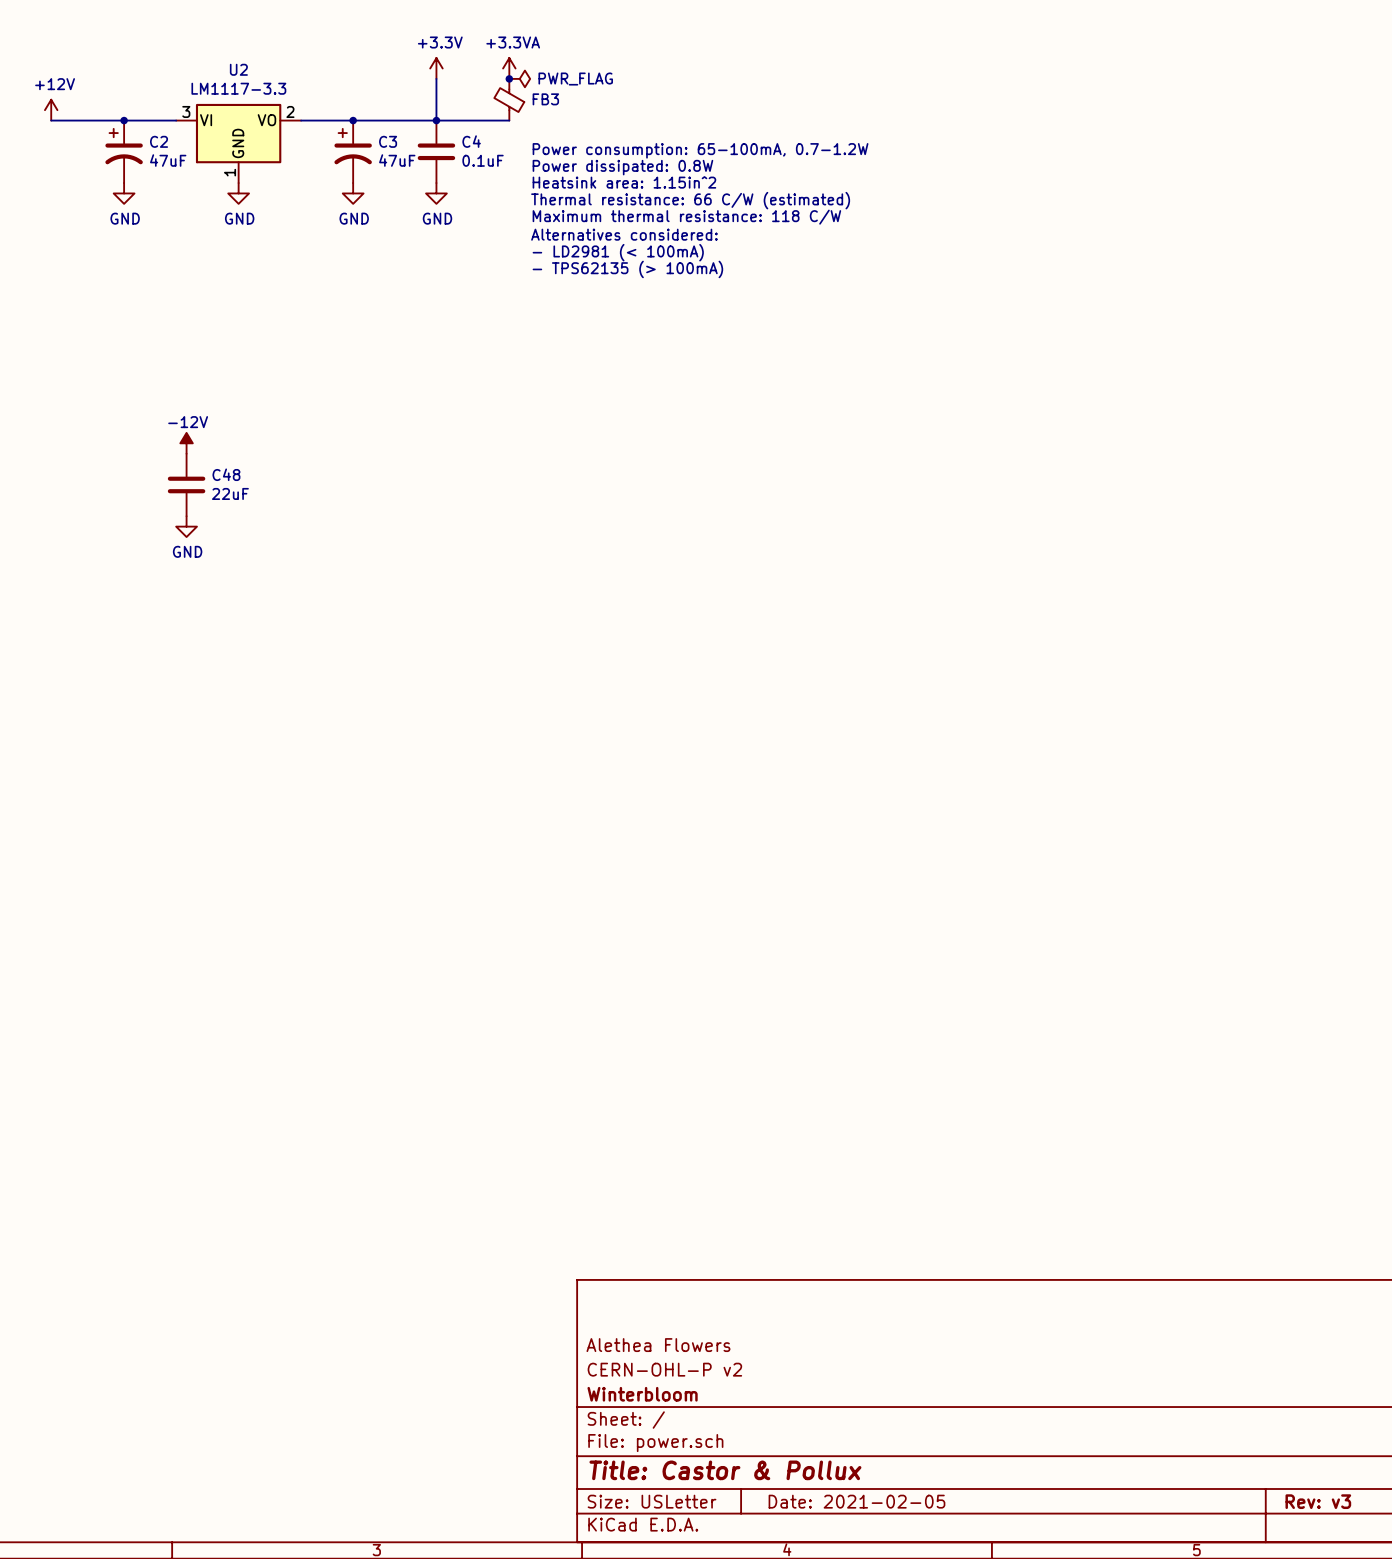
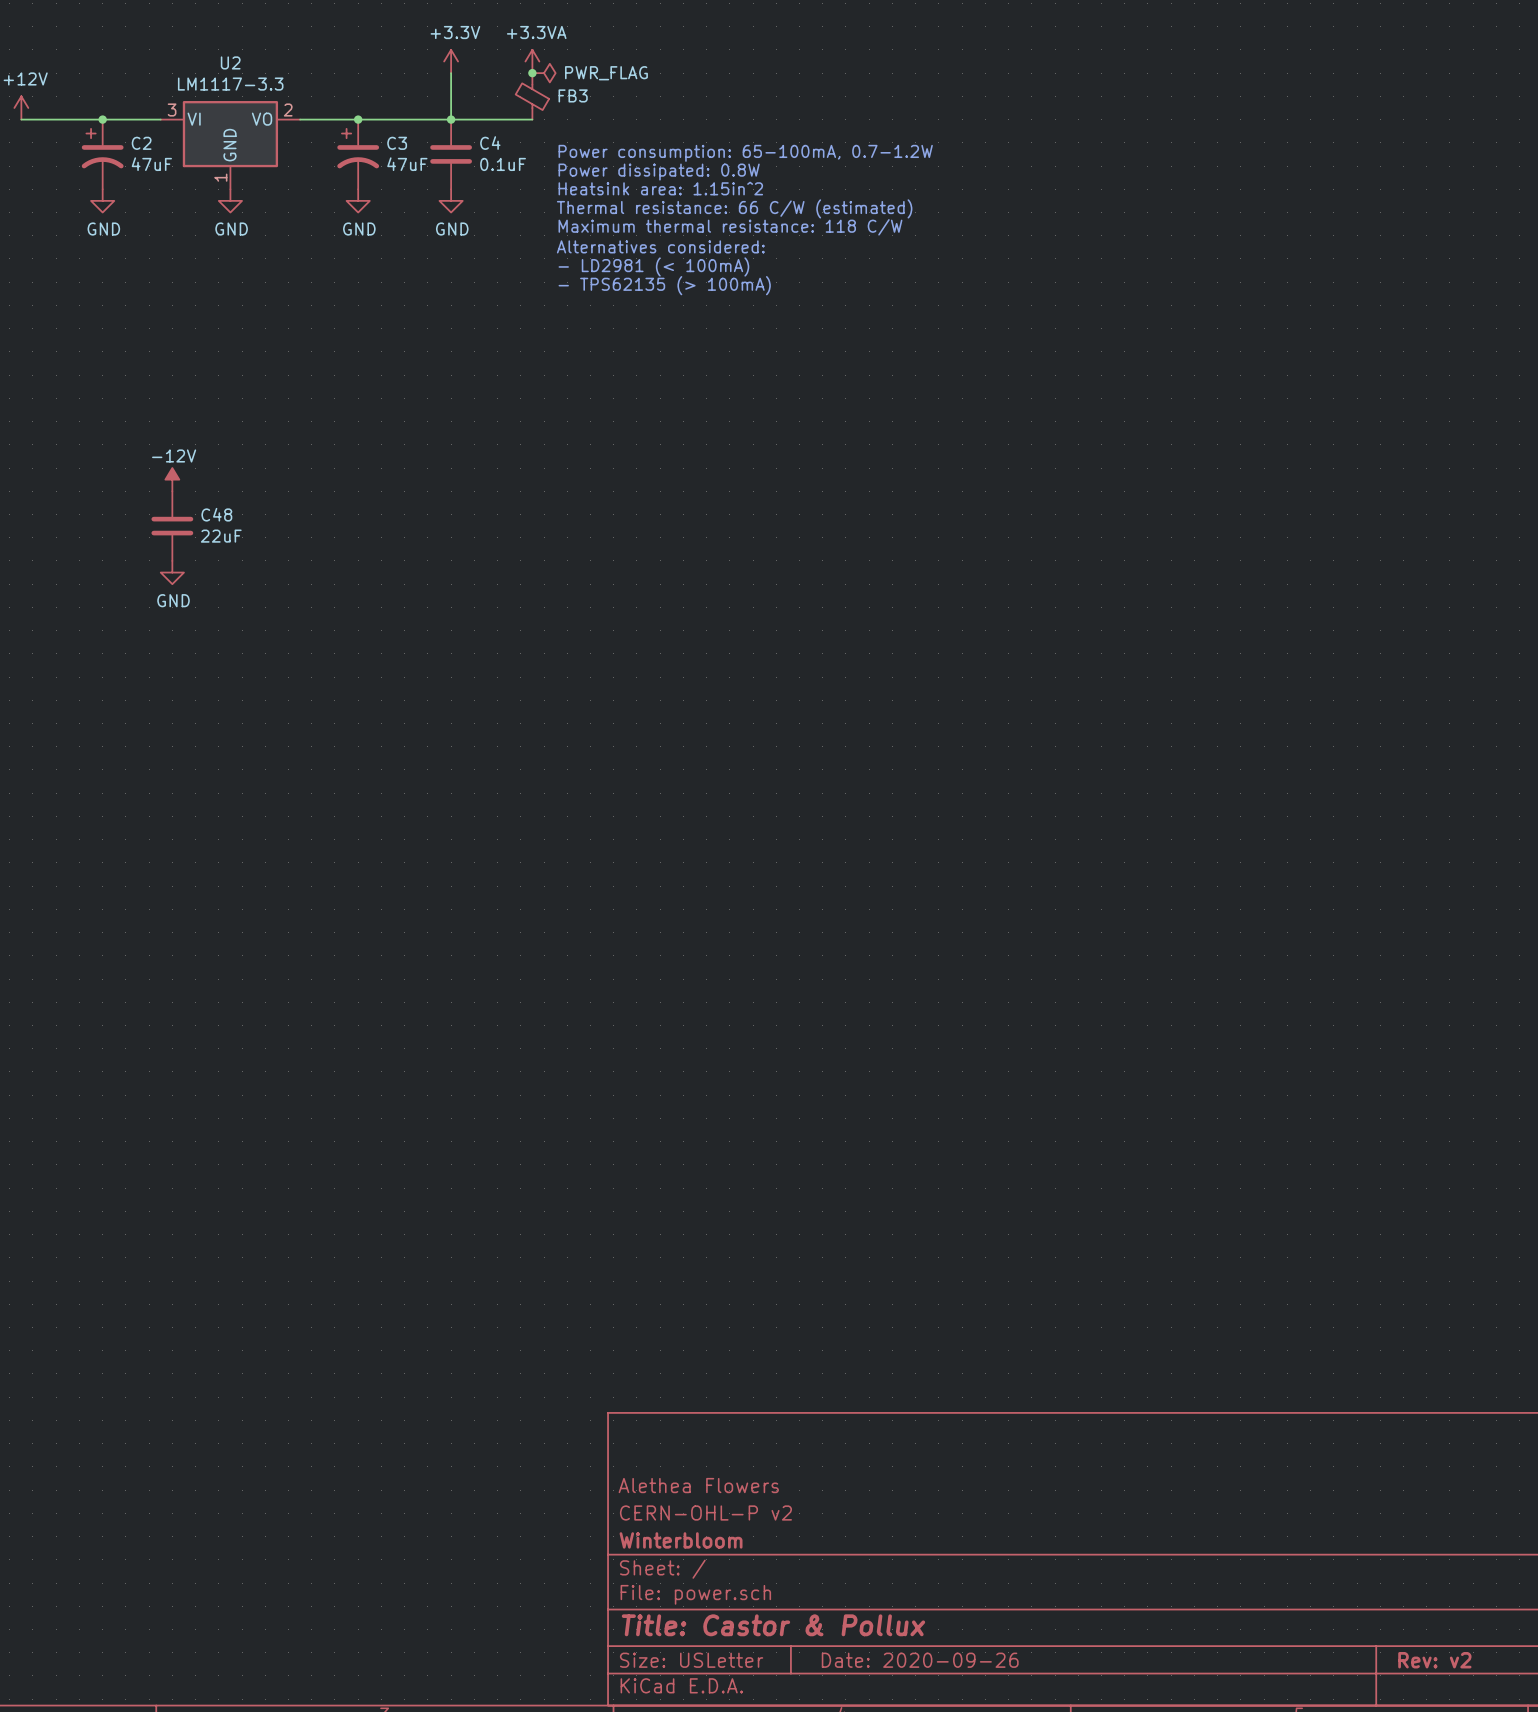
title block: Date: 2021-02-05 (856, 1501) -> Date: 2020-09-26 (920, 1660)
title block: Rev: v3 (1318, 1501) -> Rev: v2 (1434, 1660)

